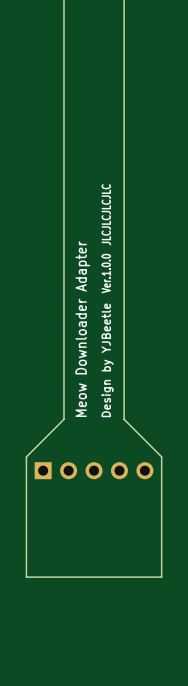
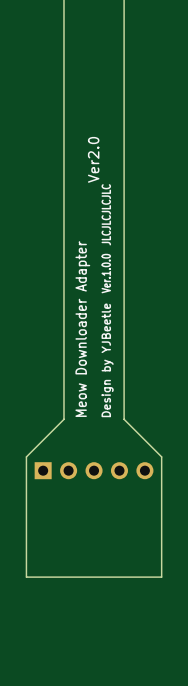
text: none -> Ver2.0 (93, 159)

